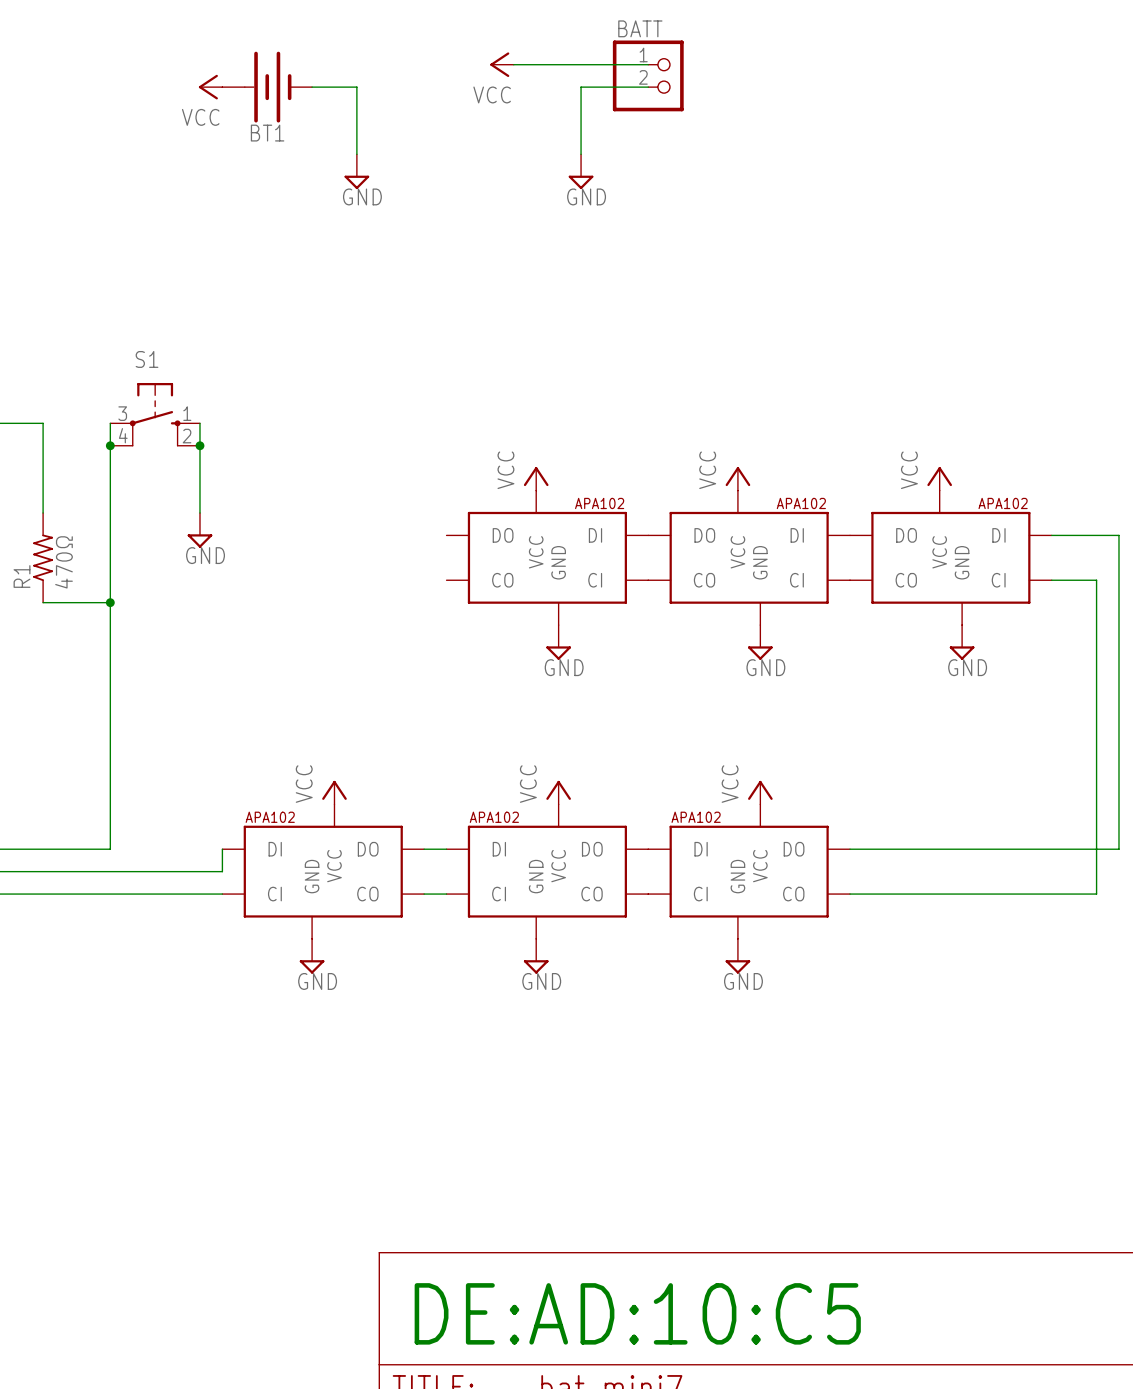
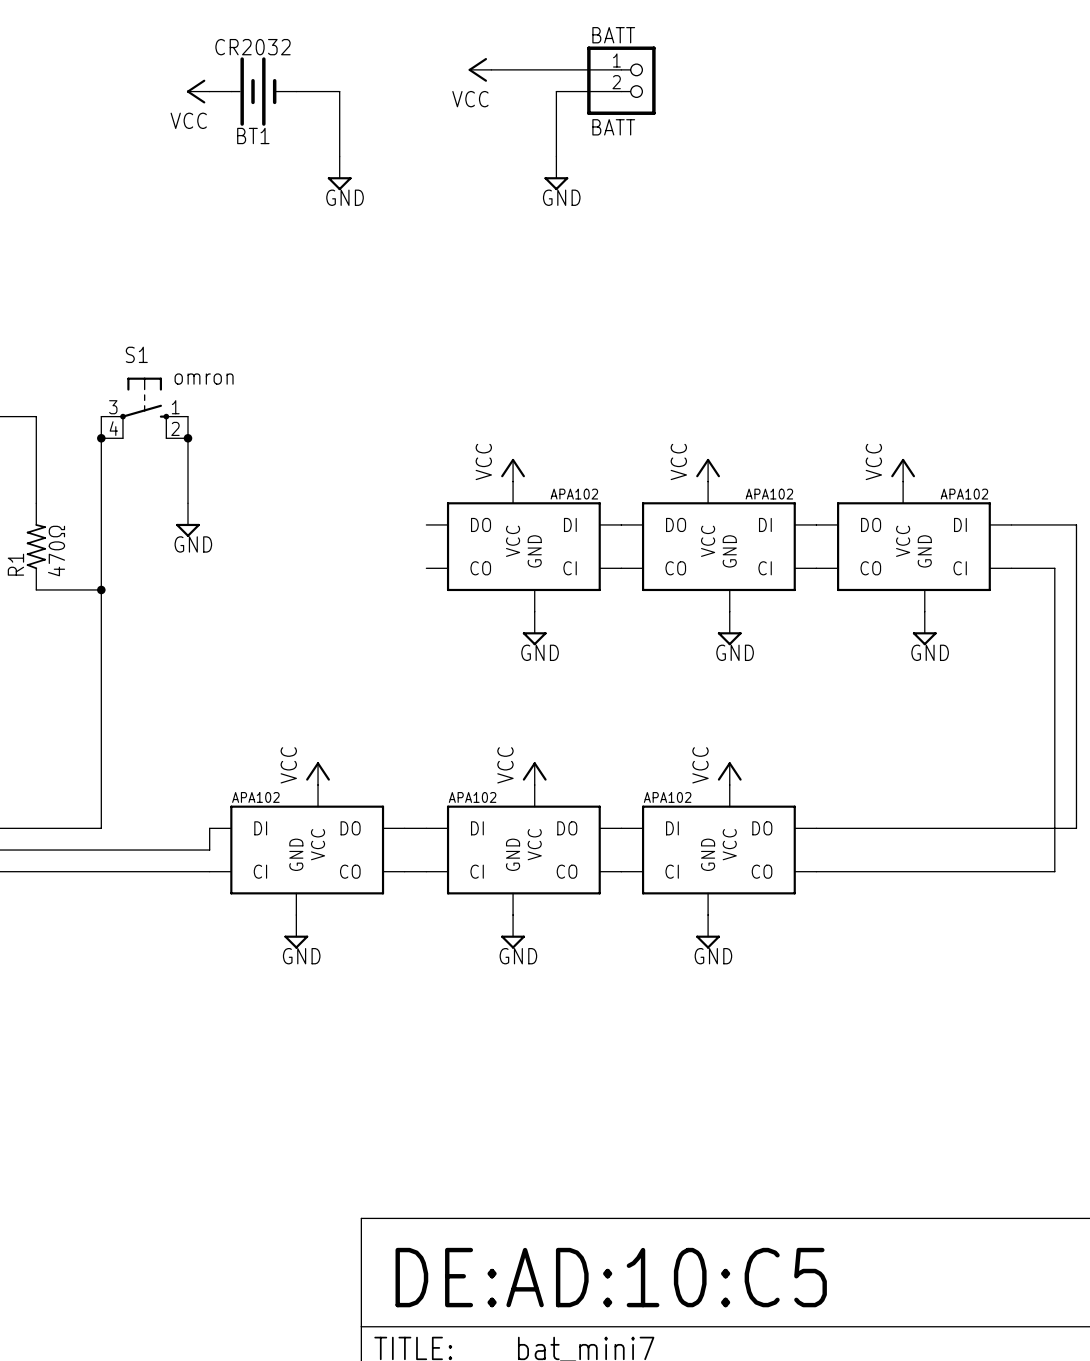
BT1 value: none -> CR2032 (253, 47)
BATT value: none -> BATT (613, 127)
S1 value: none -> omron (204, 379)

